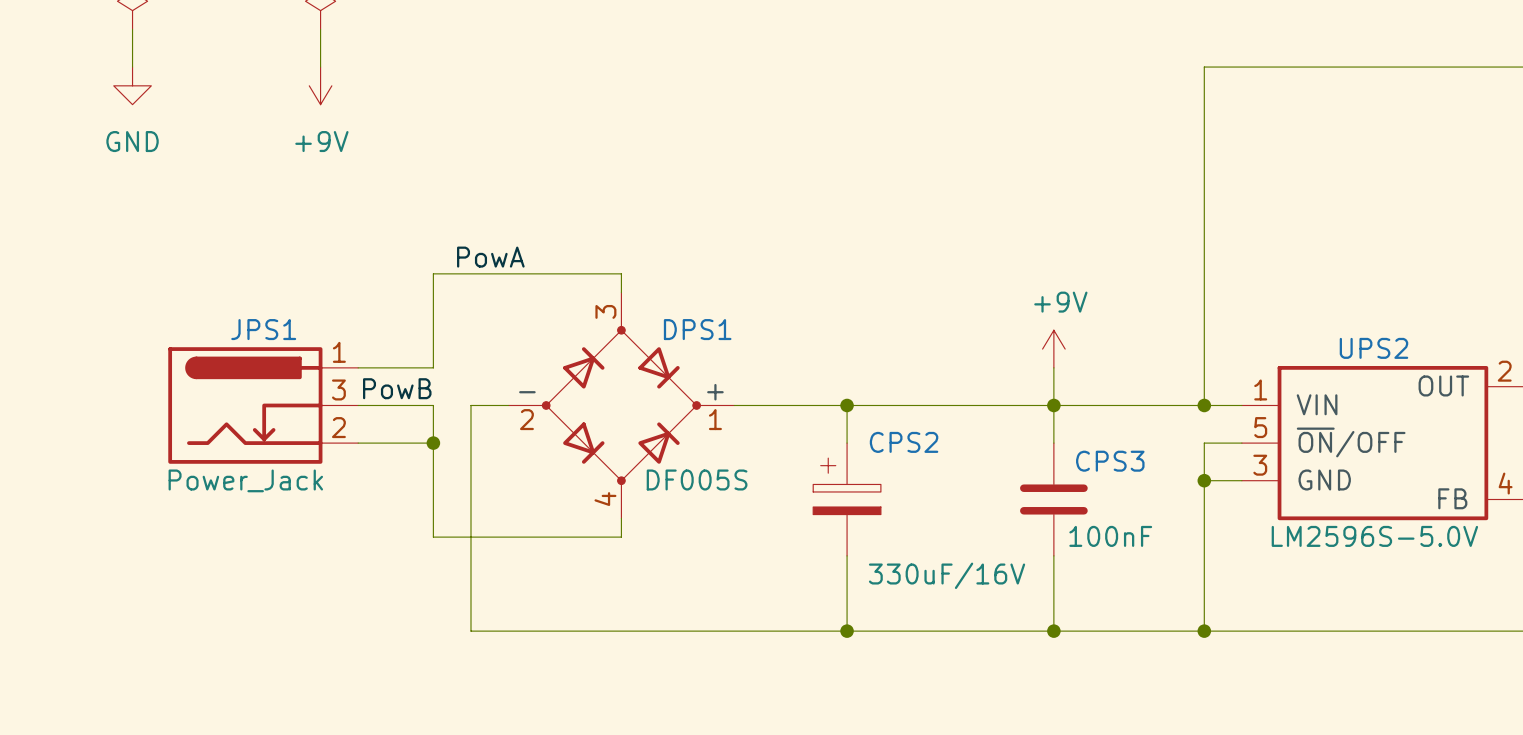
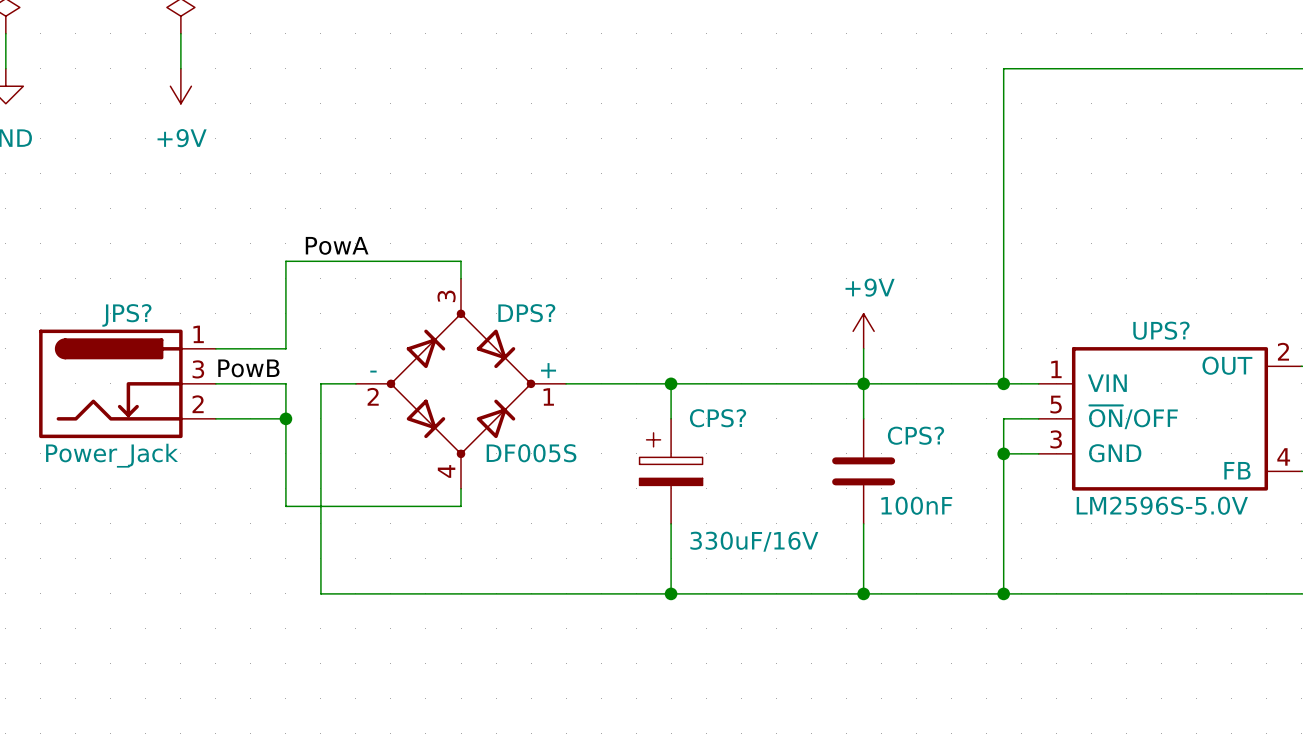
JPS1 name: JPS1 (263, 329) -> JPS? (126, 315)
DPS1 name: DPS1 (697, 329) -> DPS? (526, 313)
UPS2 name: UPS2 (1373, 348) -> UPS? (1161, 330)
CPS2 name: CPS2 (904, 442) -> CPS? (718, 418)
CPS3 name: CPS3 (1110, 461) -> CPS? (915, 435)

